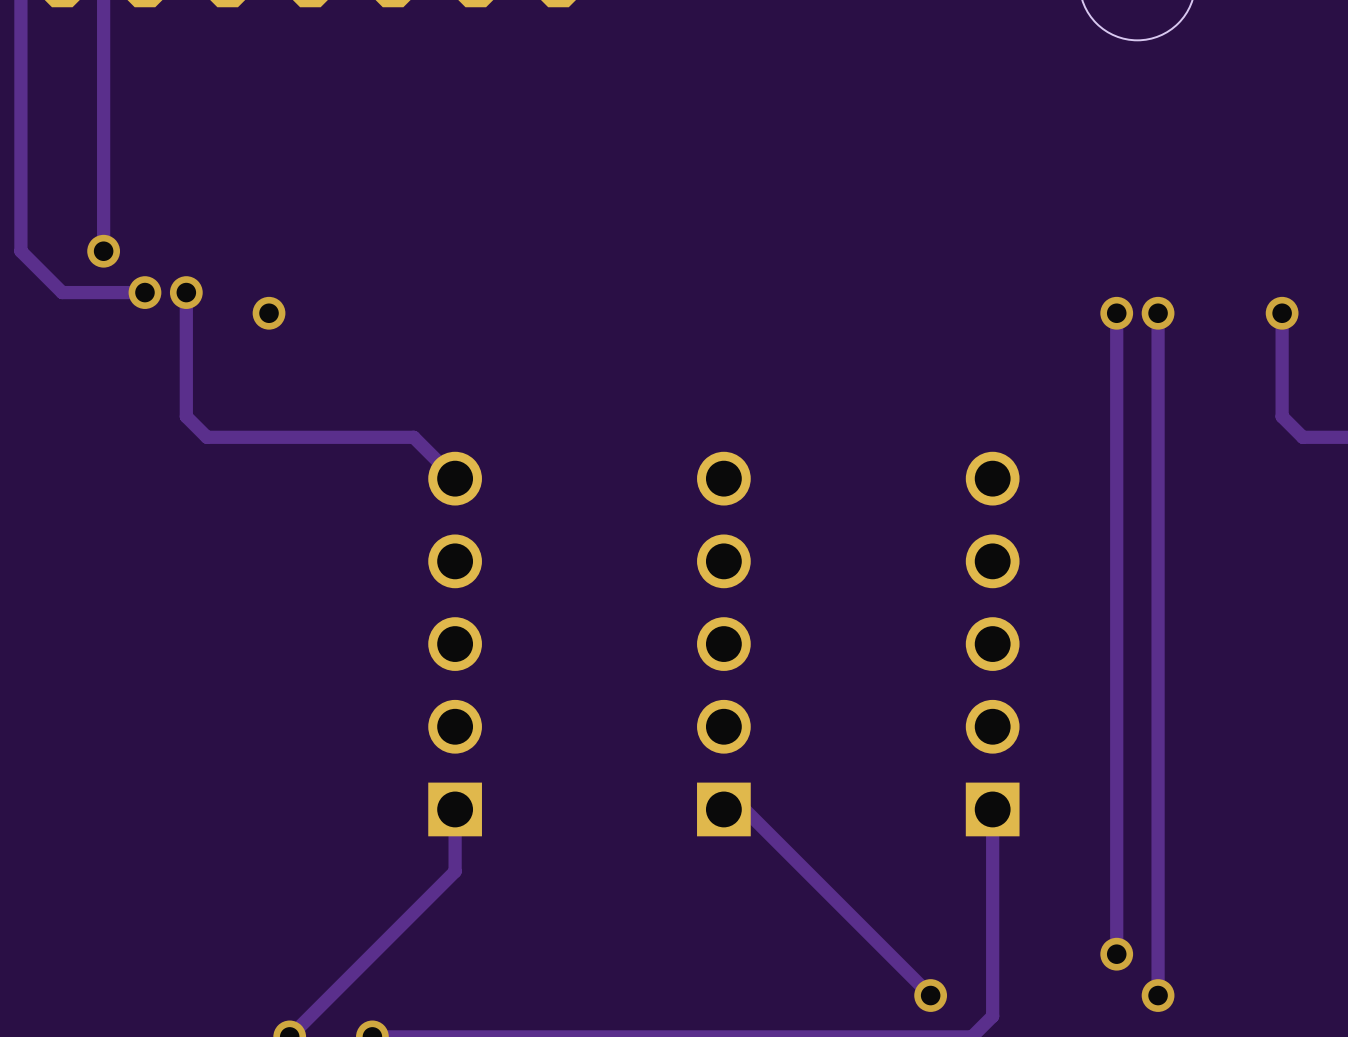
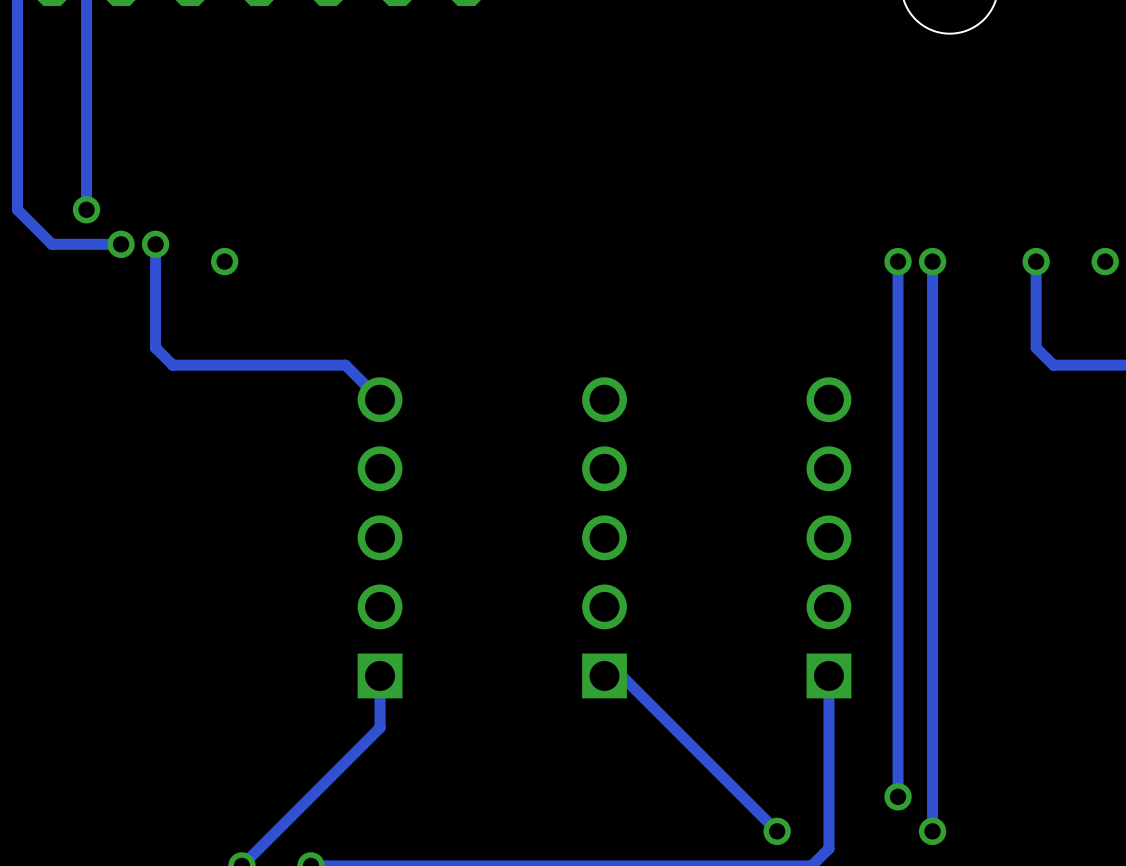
track: none -> (898, 261) (898, 796)
via: none -> (898, 261)
track: (1158, 313) (1158, 995) -> none
via: (1158, 313) -> none
via: none -> (1036, 261)
track: (1282, 313) (1282, 416) (1302, 437) -> (1036, 261) (1036, 347) (1053, 365) (1087, 365)
via: (1282, 313) -> none
via: none -> (1105, 261)
via: none -> (898, 796)
track: none -> (932, 796) (932, 831)
via: (1116, 954) -> none
via: none -> (932, 831)
via: (1158, 995) -> none

